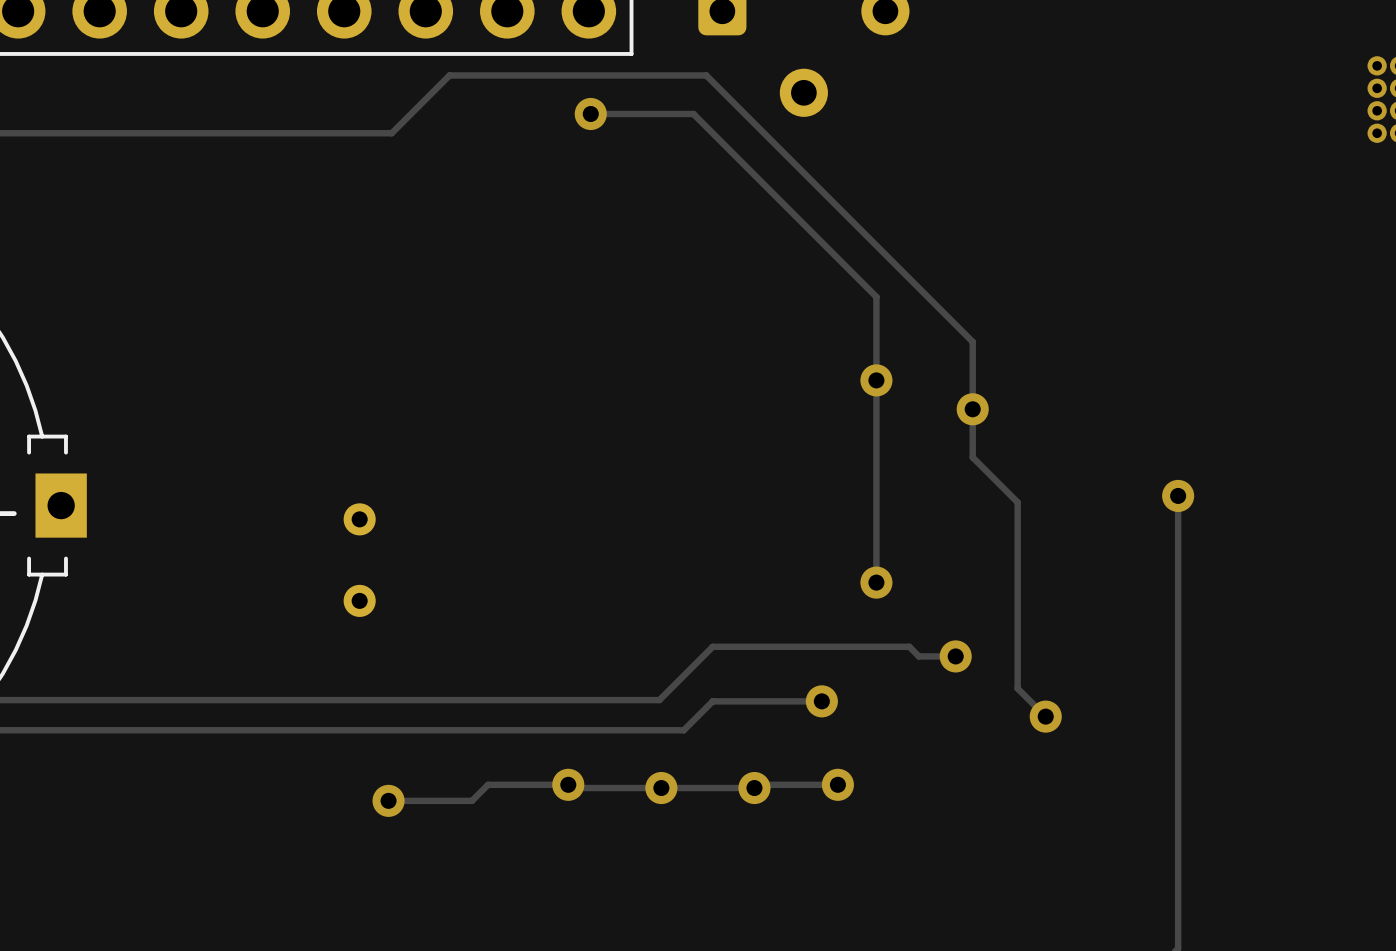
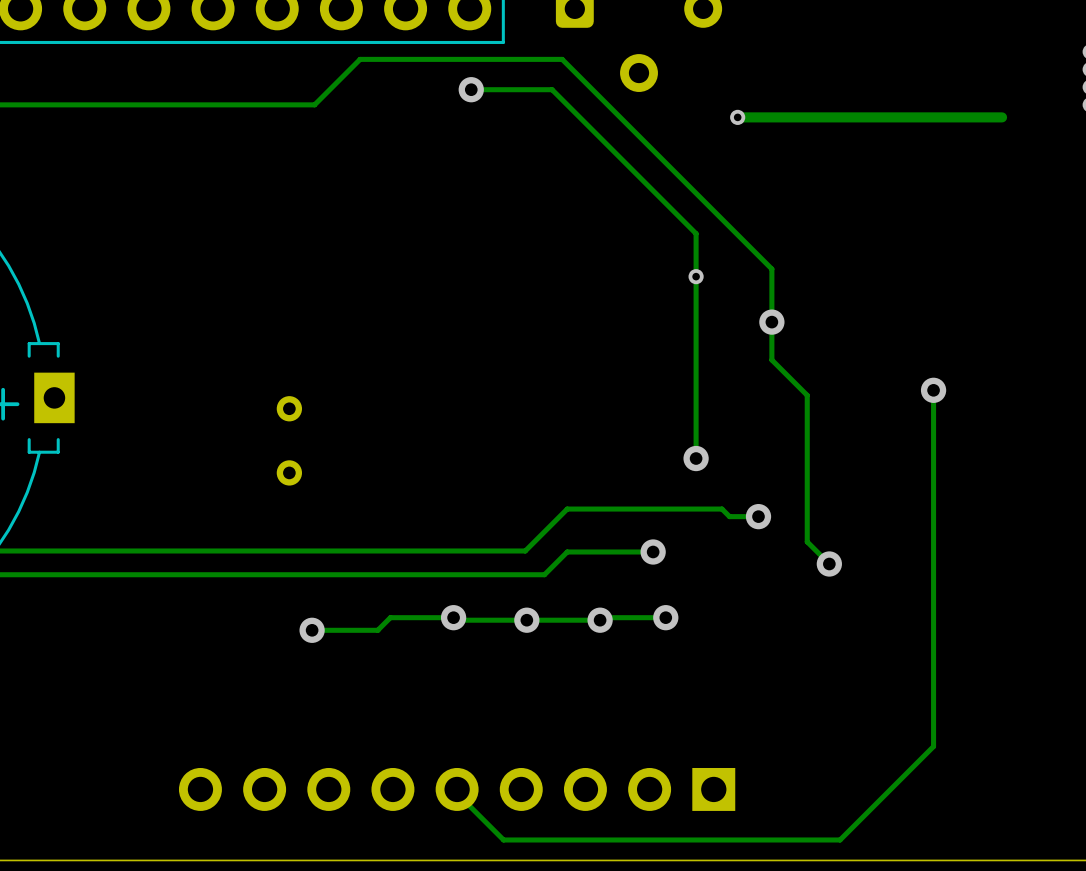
via: none -> (737, 117)
track: none -> (1002, 117) (737, 117)
via: none -> (696, 276)
via: (876, 380) -> none

